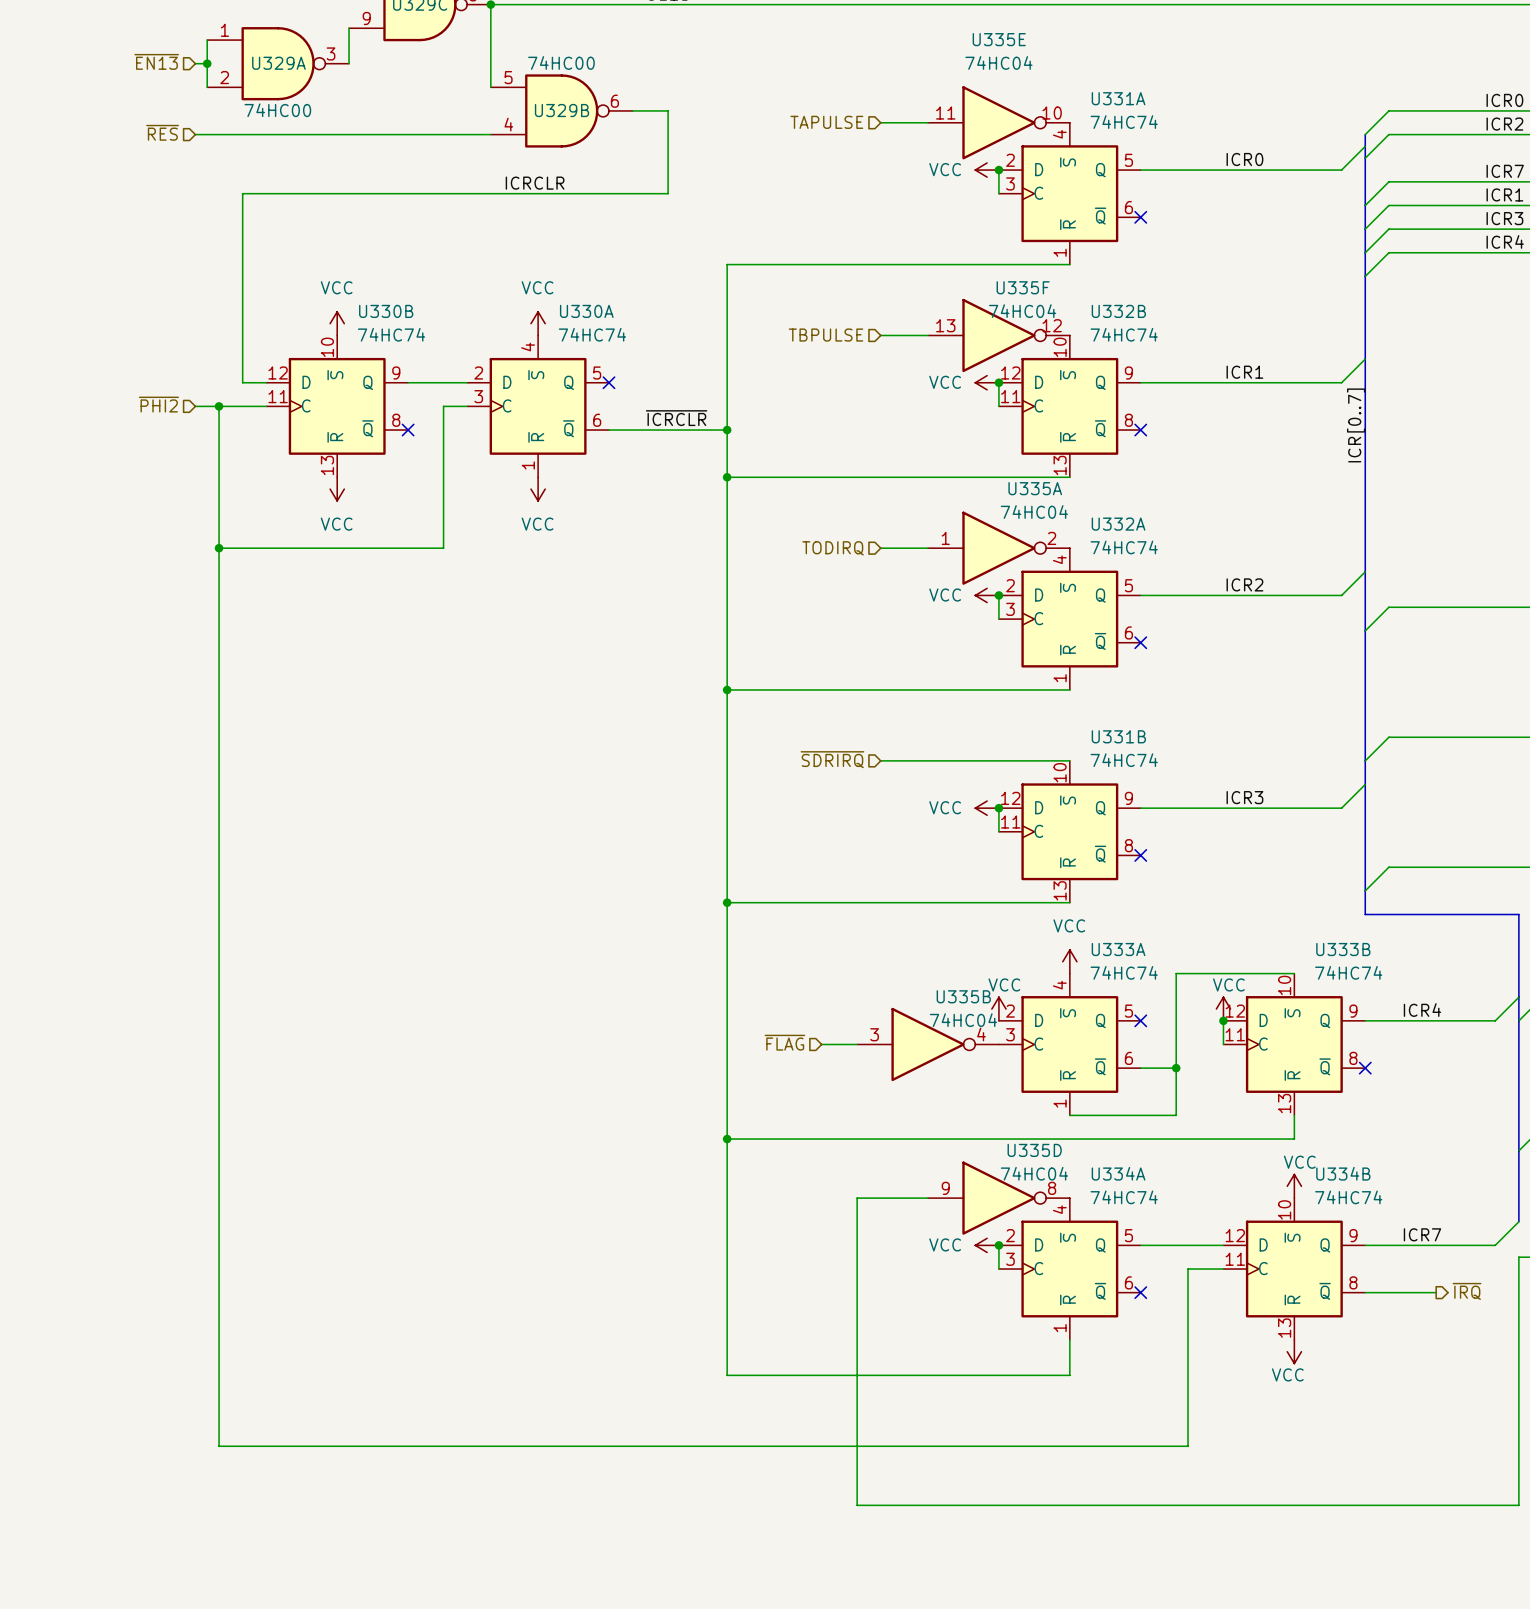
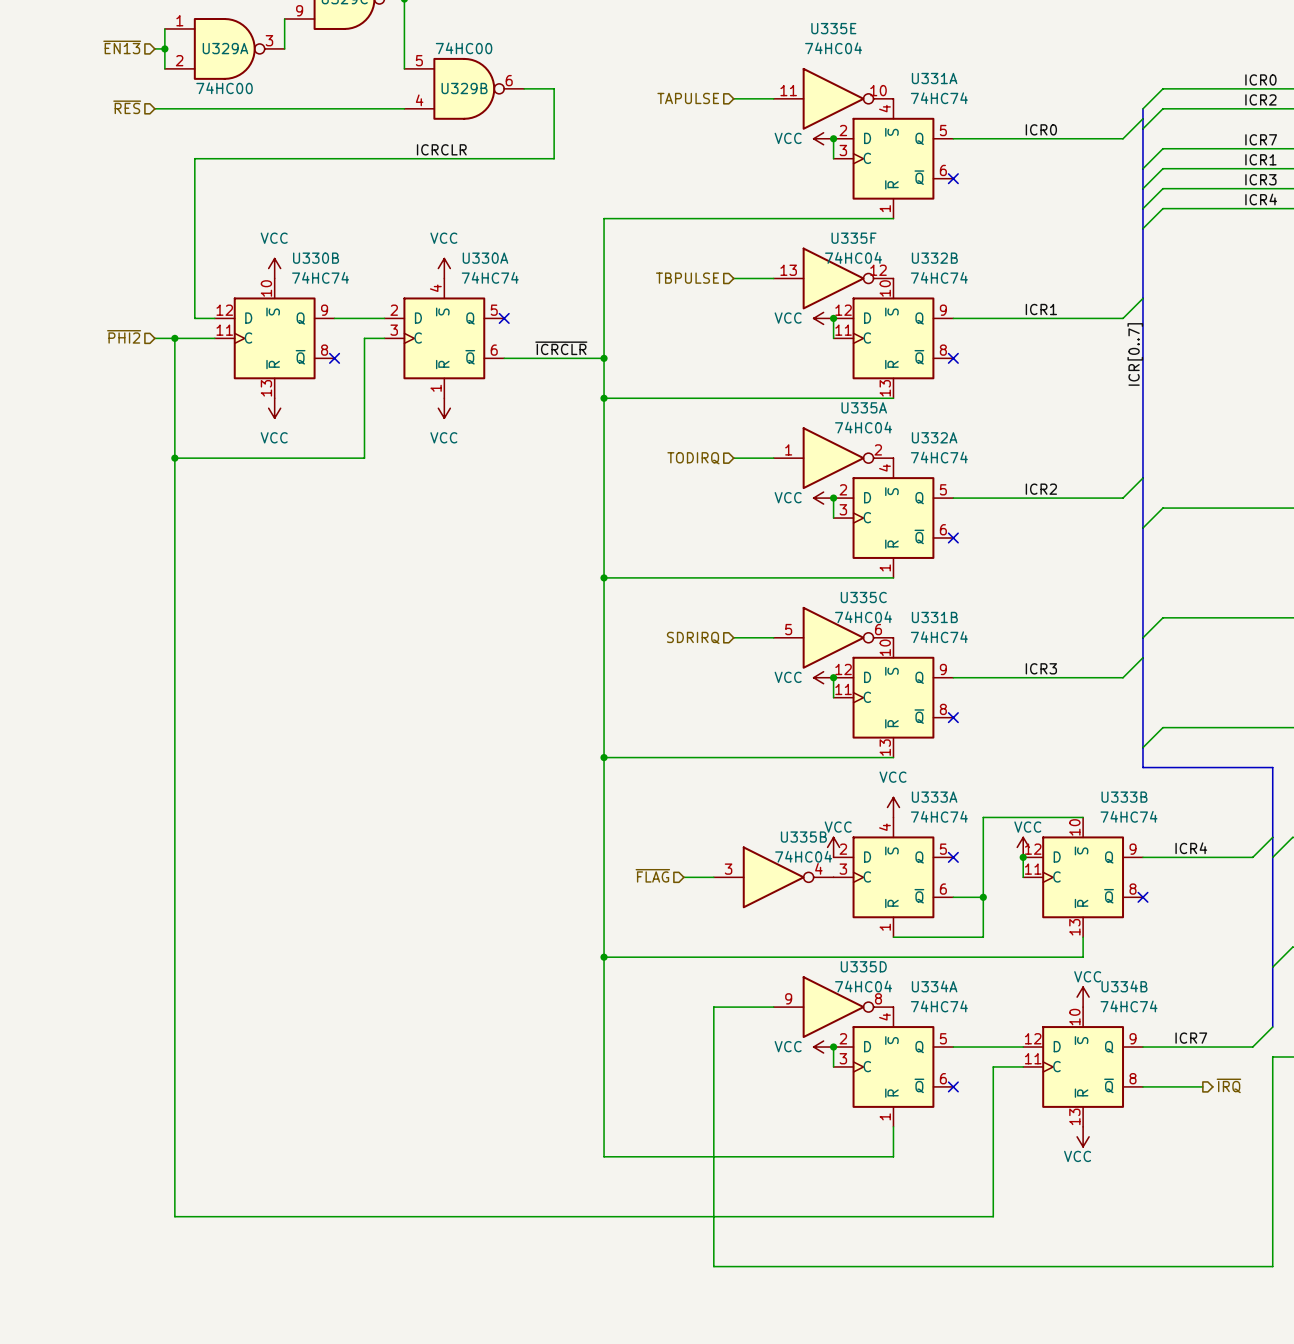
hierarchical label: ~{SDRIRQ} (832, 759) -> SDRIRQ (693, 637)
U335C: none -> 74HC04 (833, 637)

